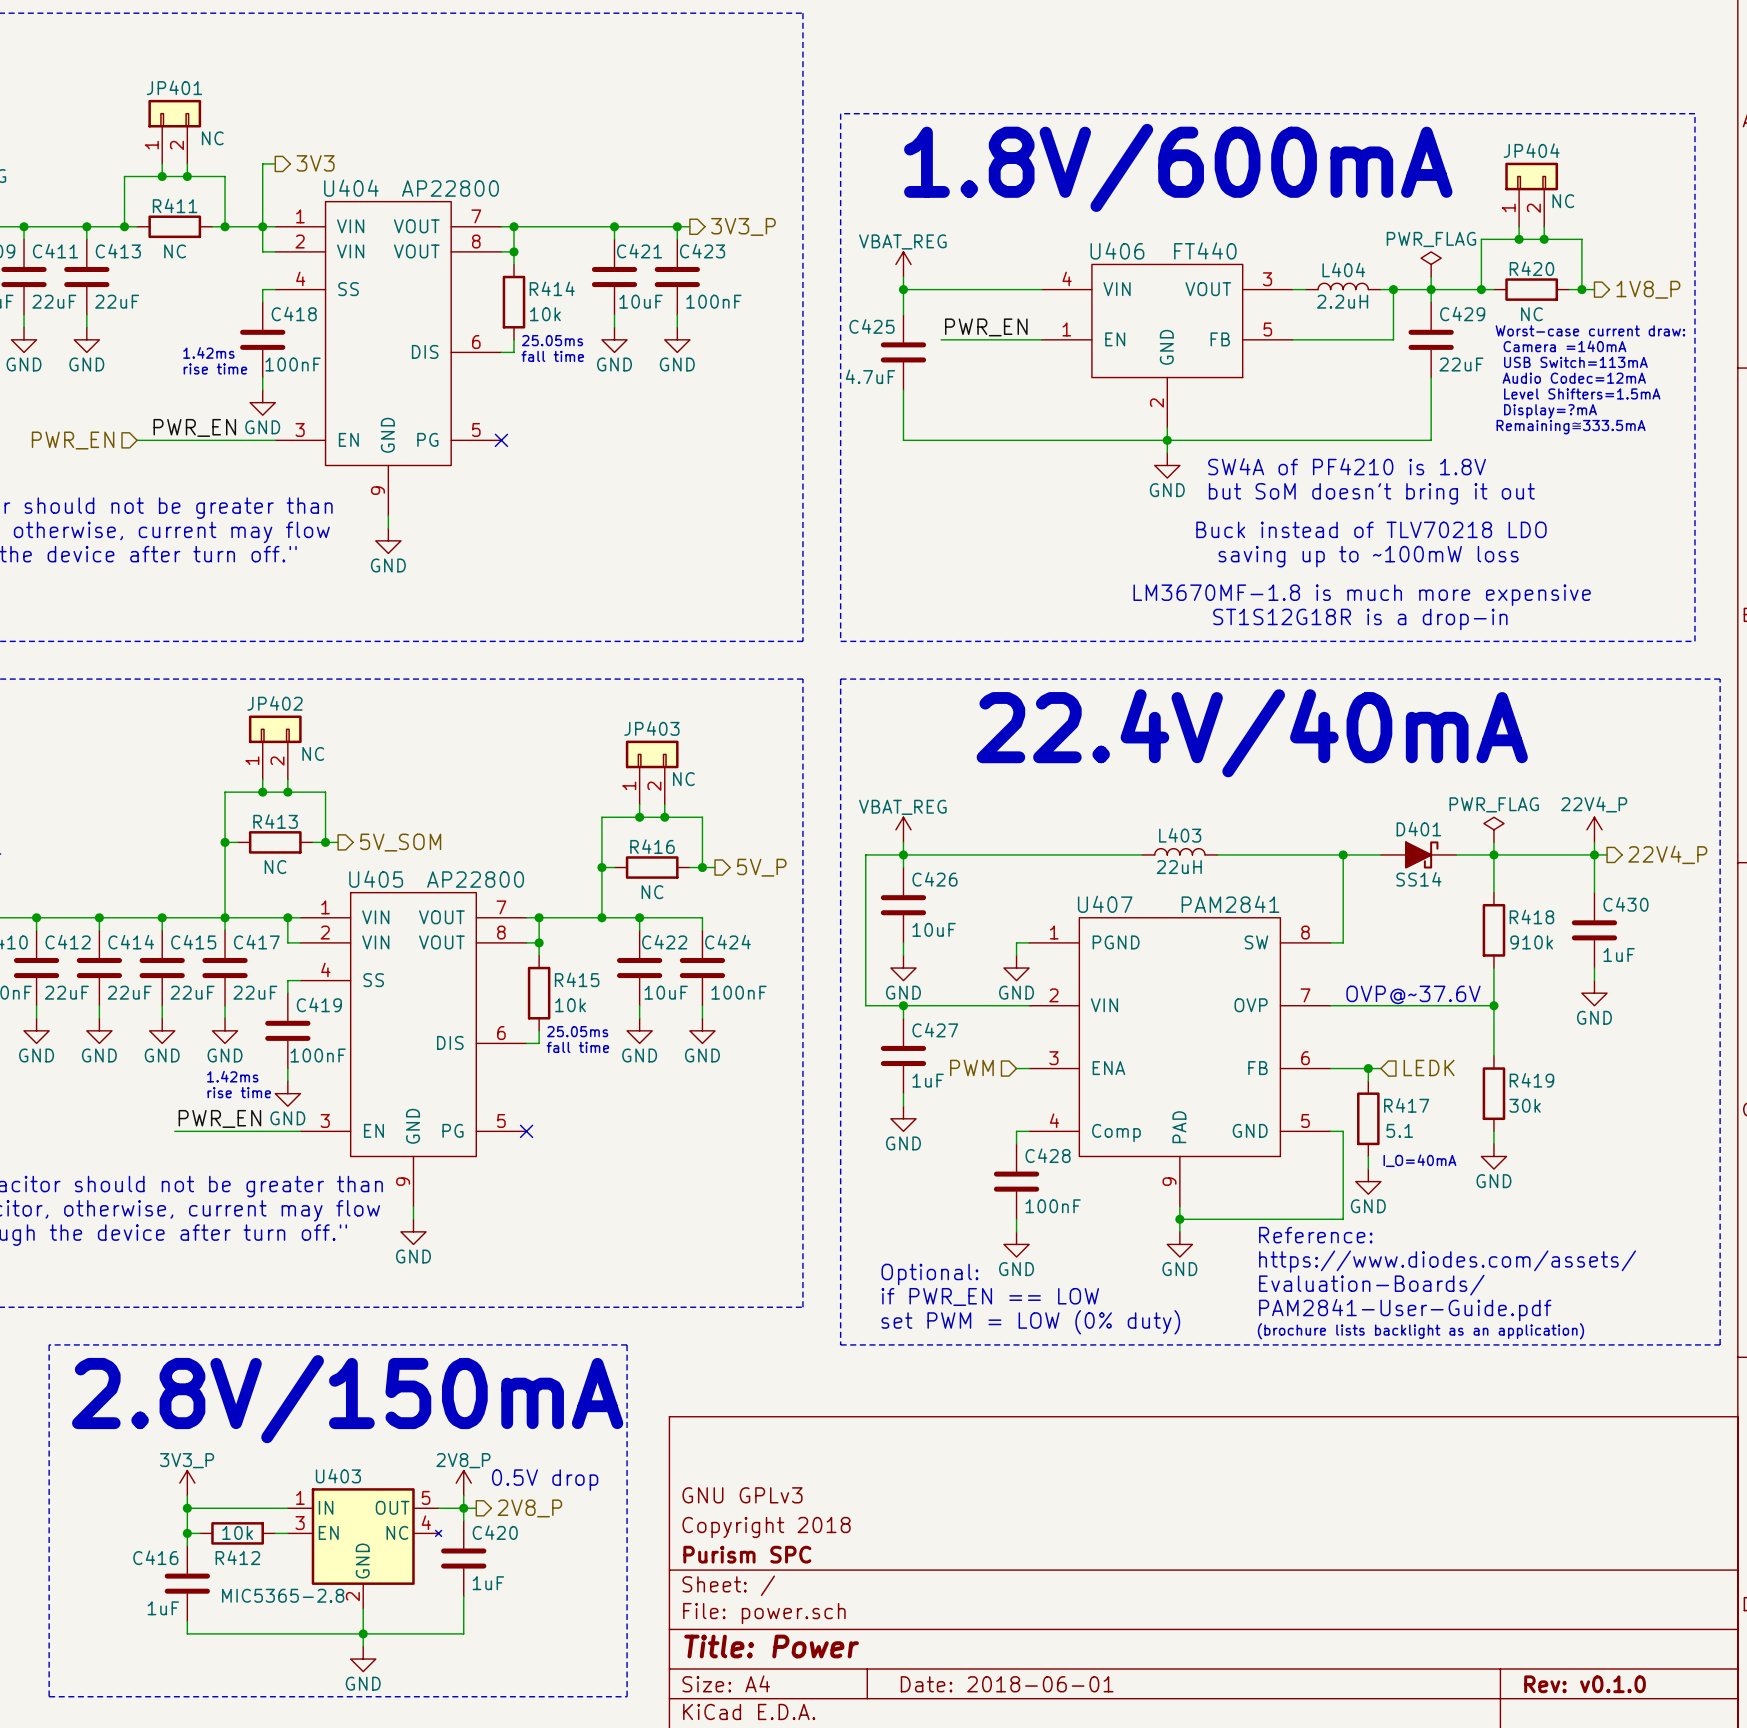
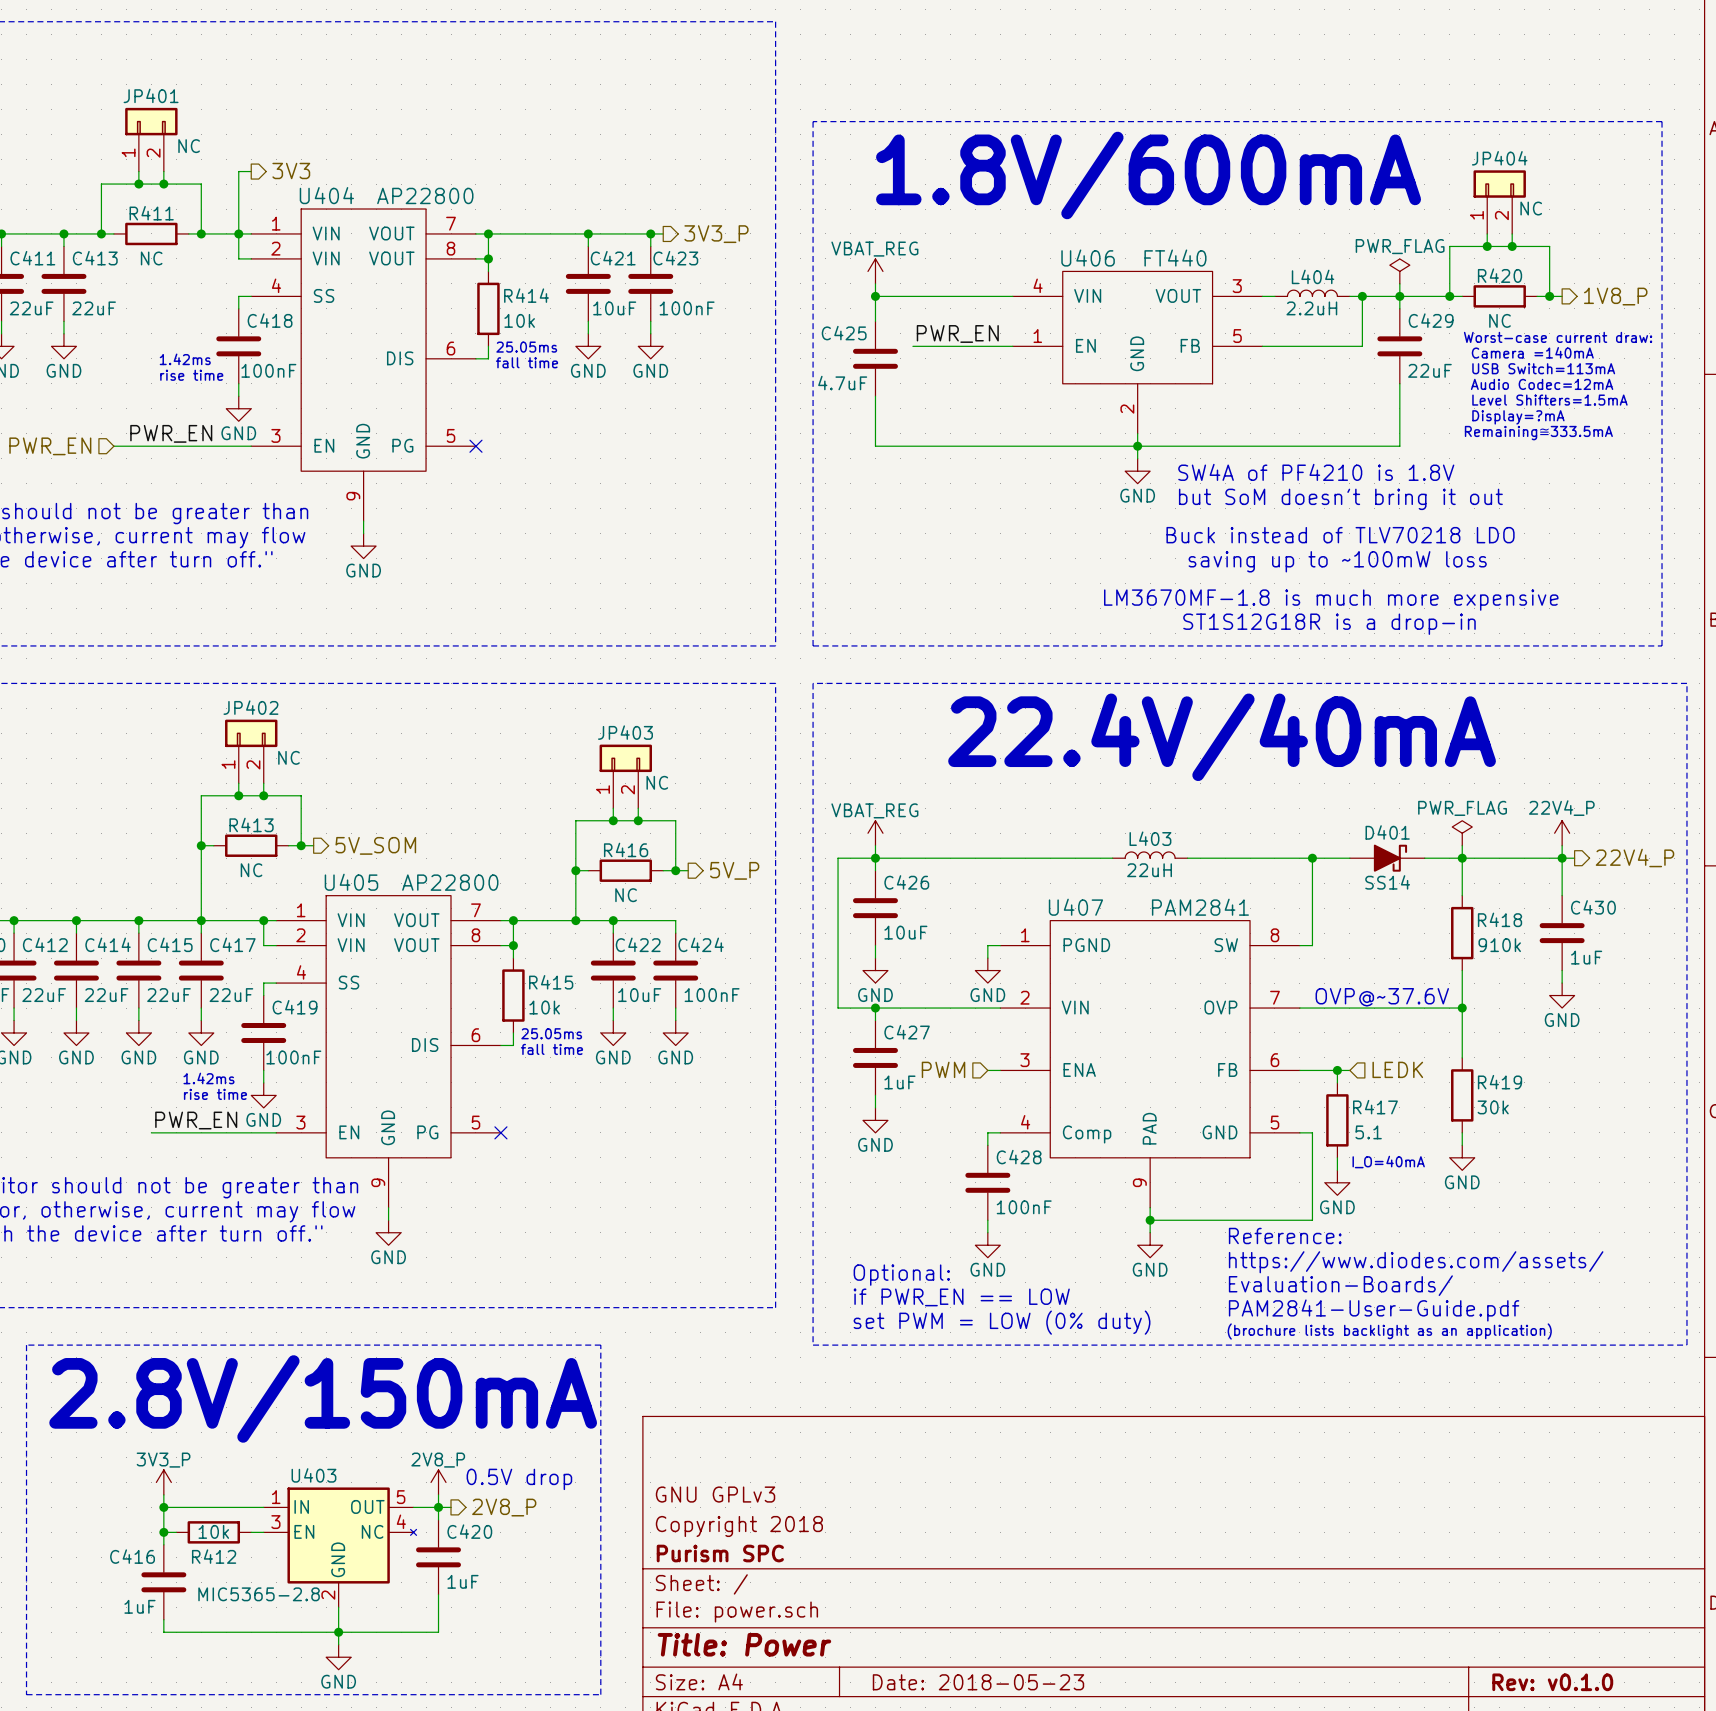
title block: Date: 2018-06-01 (1007, 1684) -> Date: 2018-05-23 (978, 1682)

